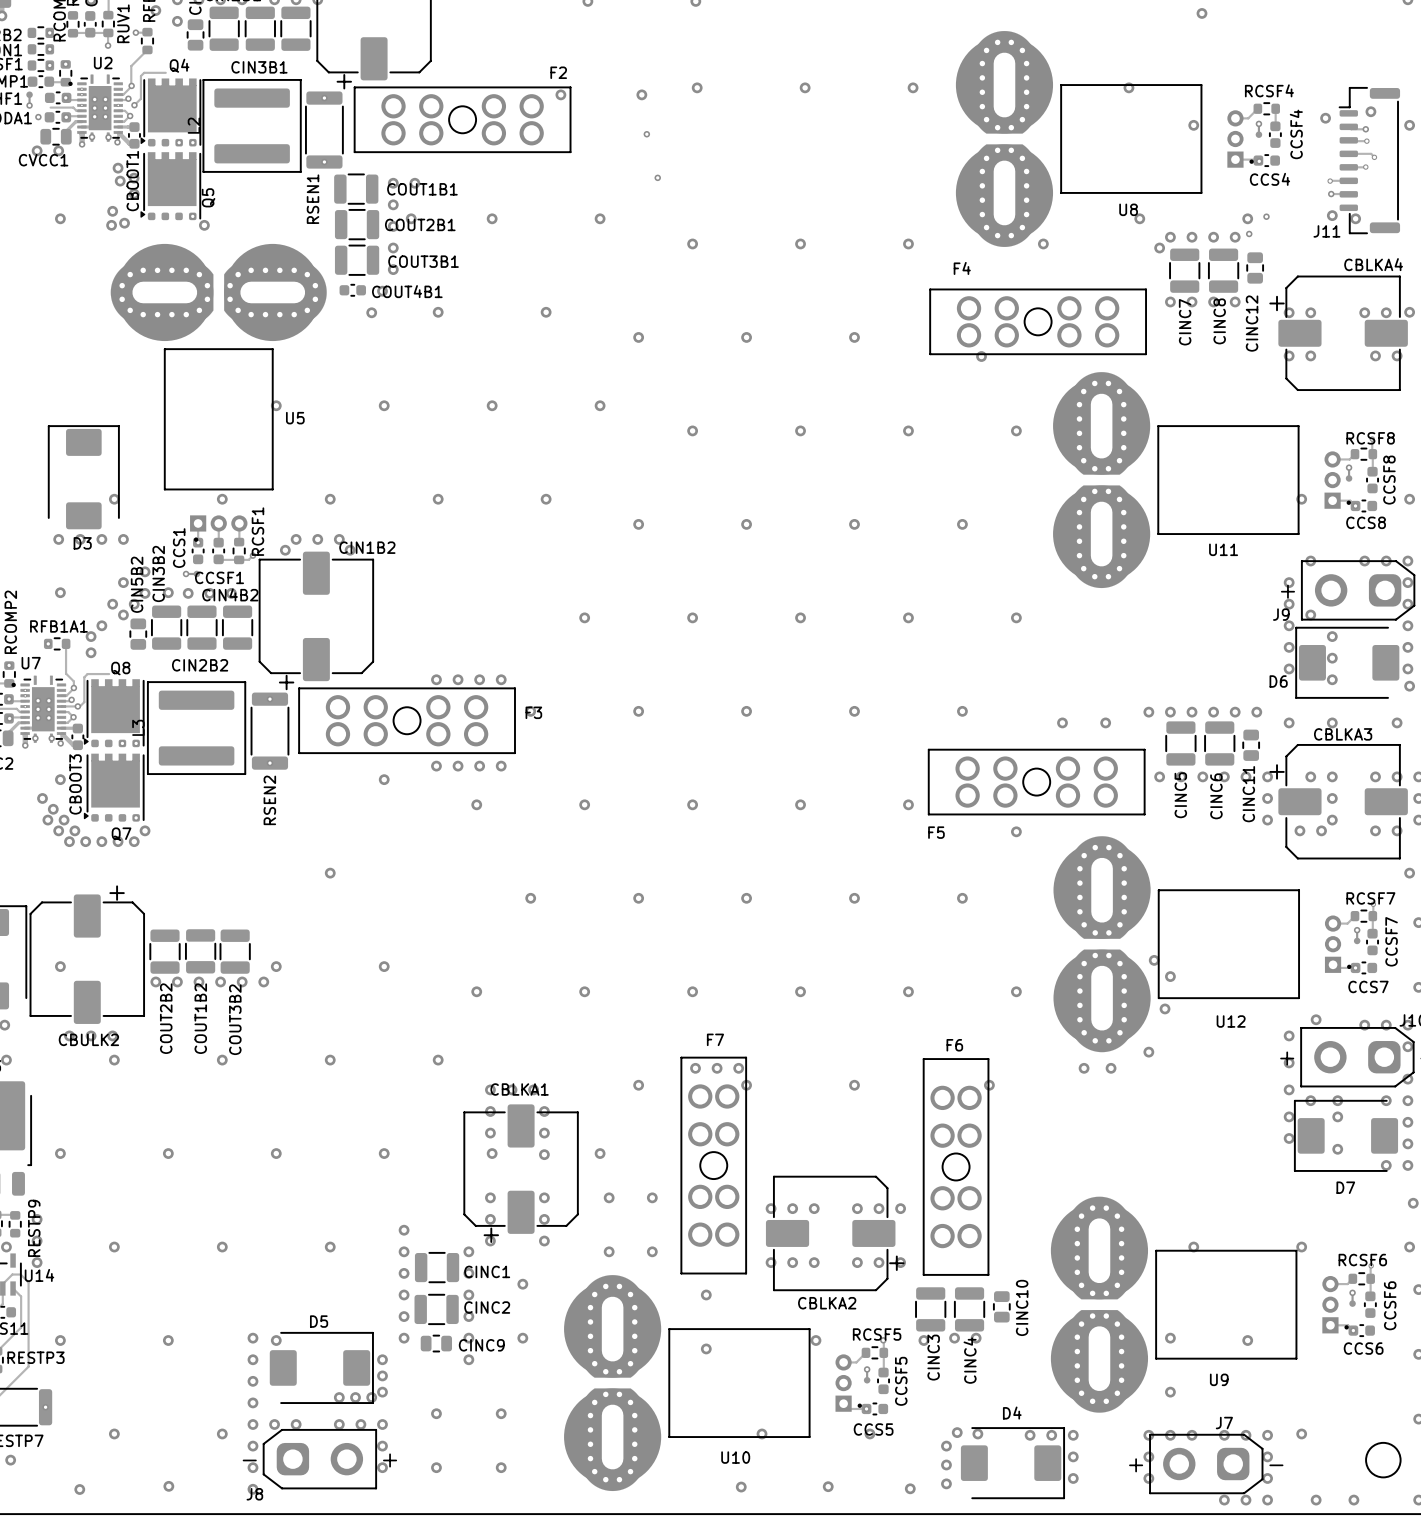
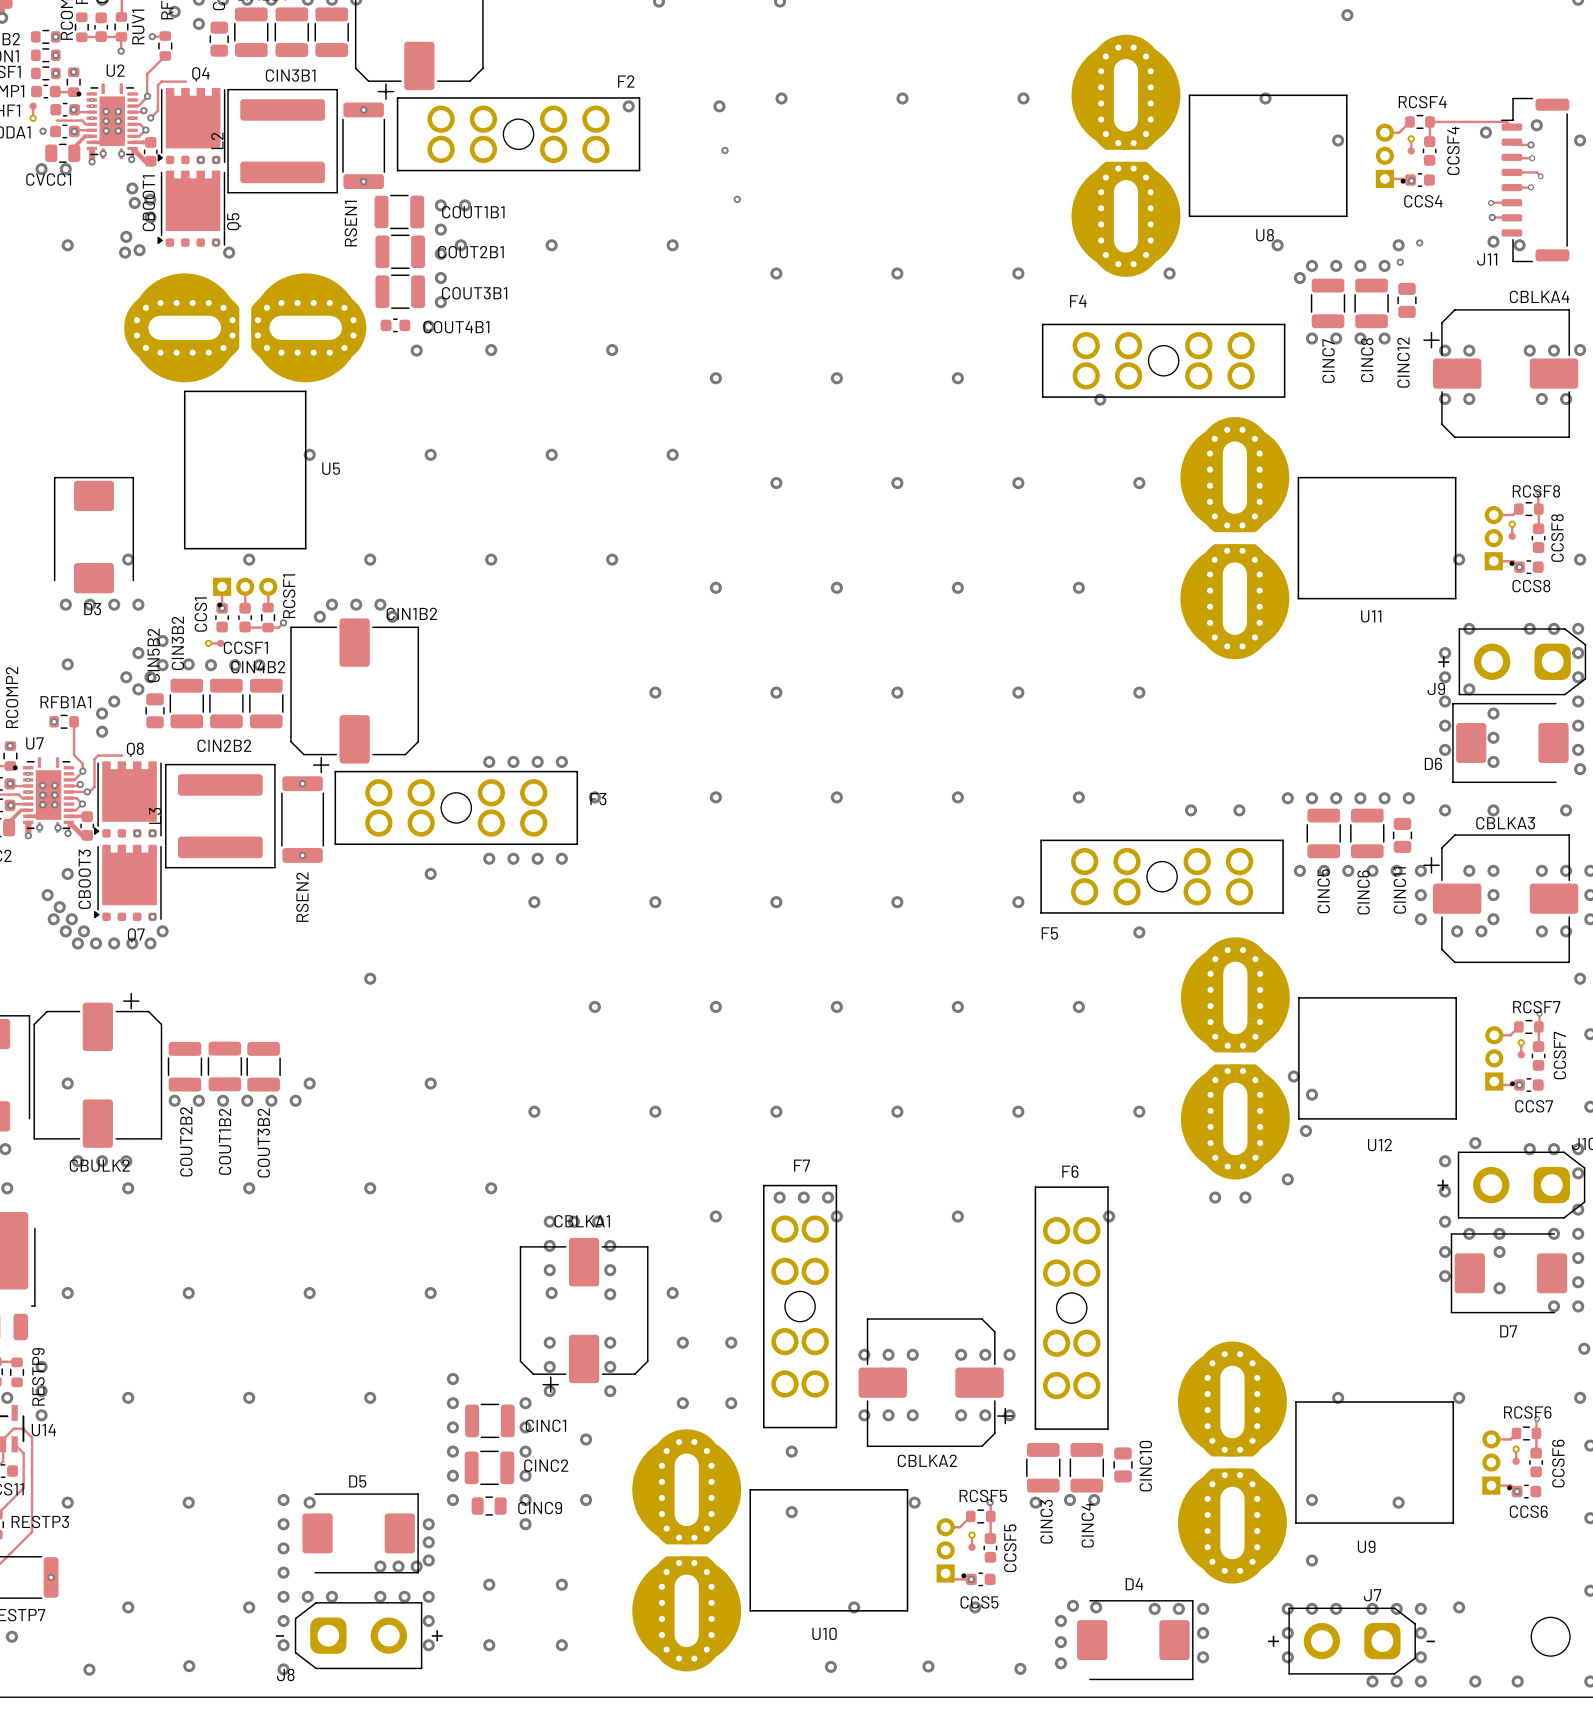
track: none -> (1429, 121) (1506, 121) (1511, 127)

